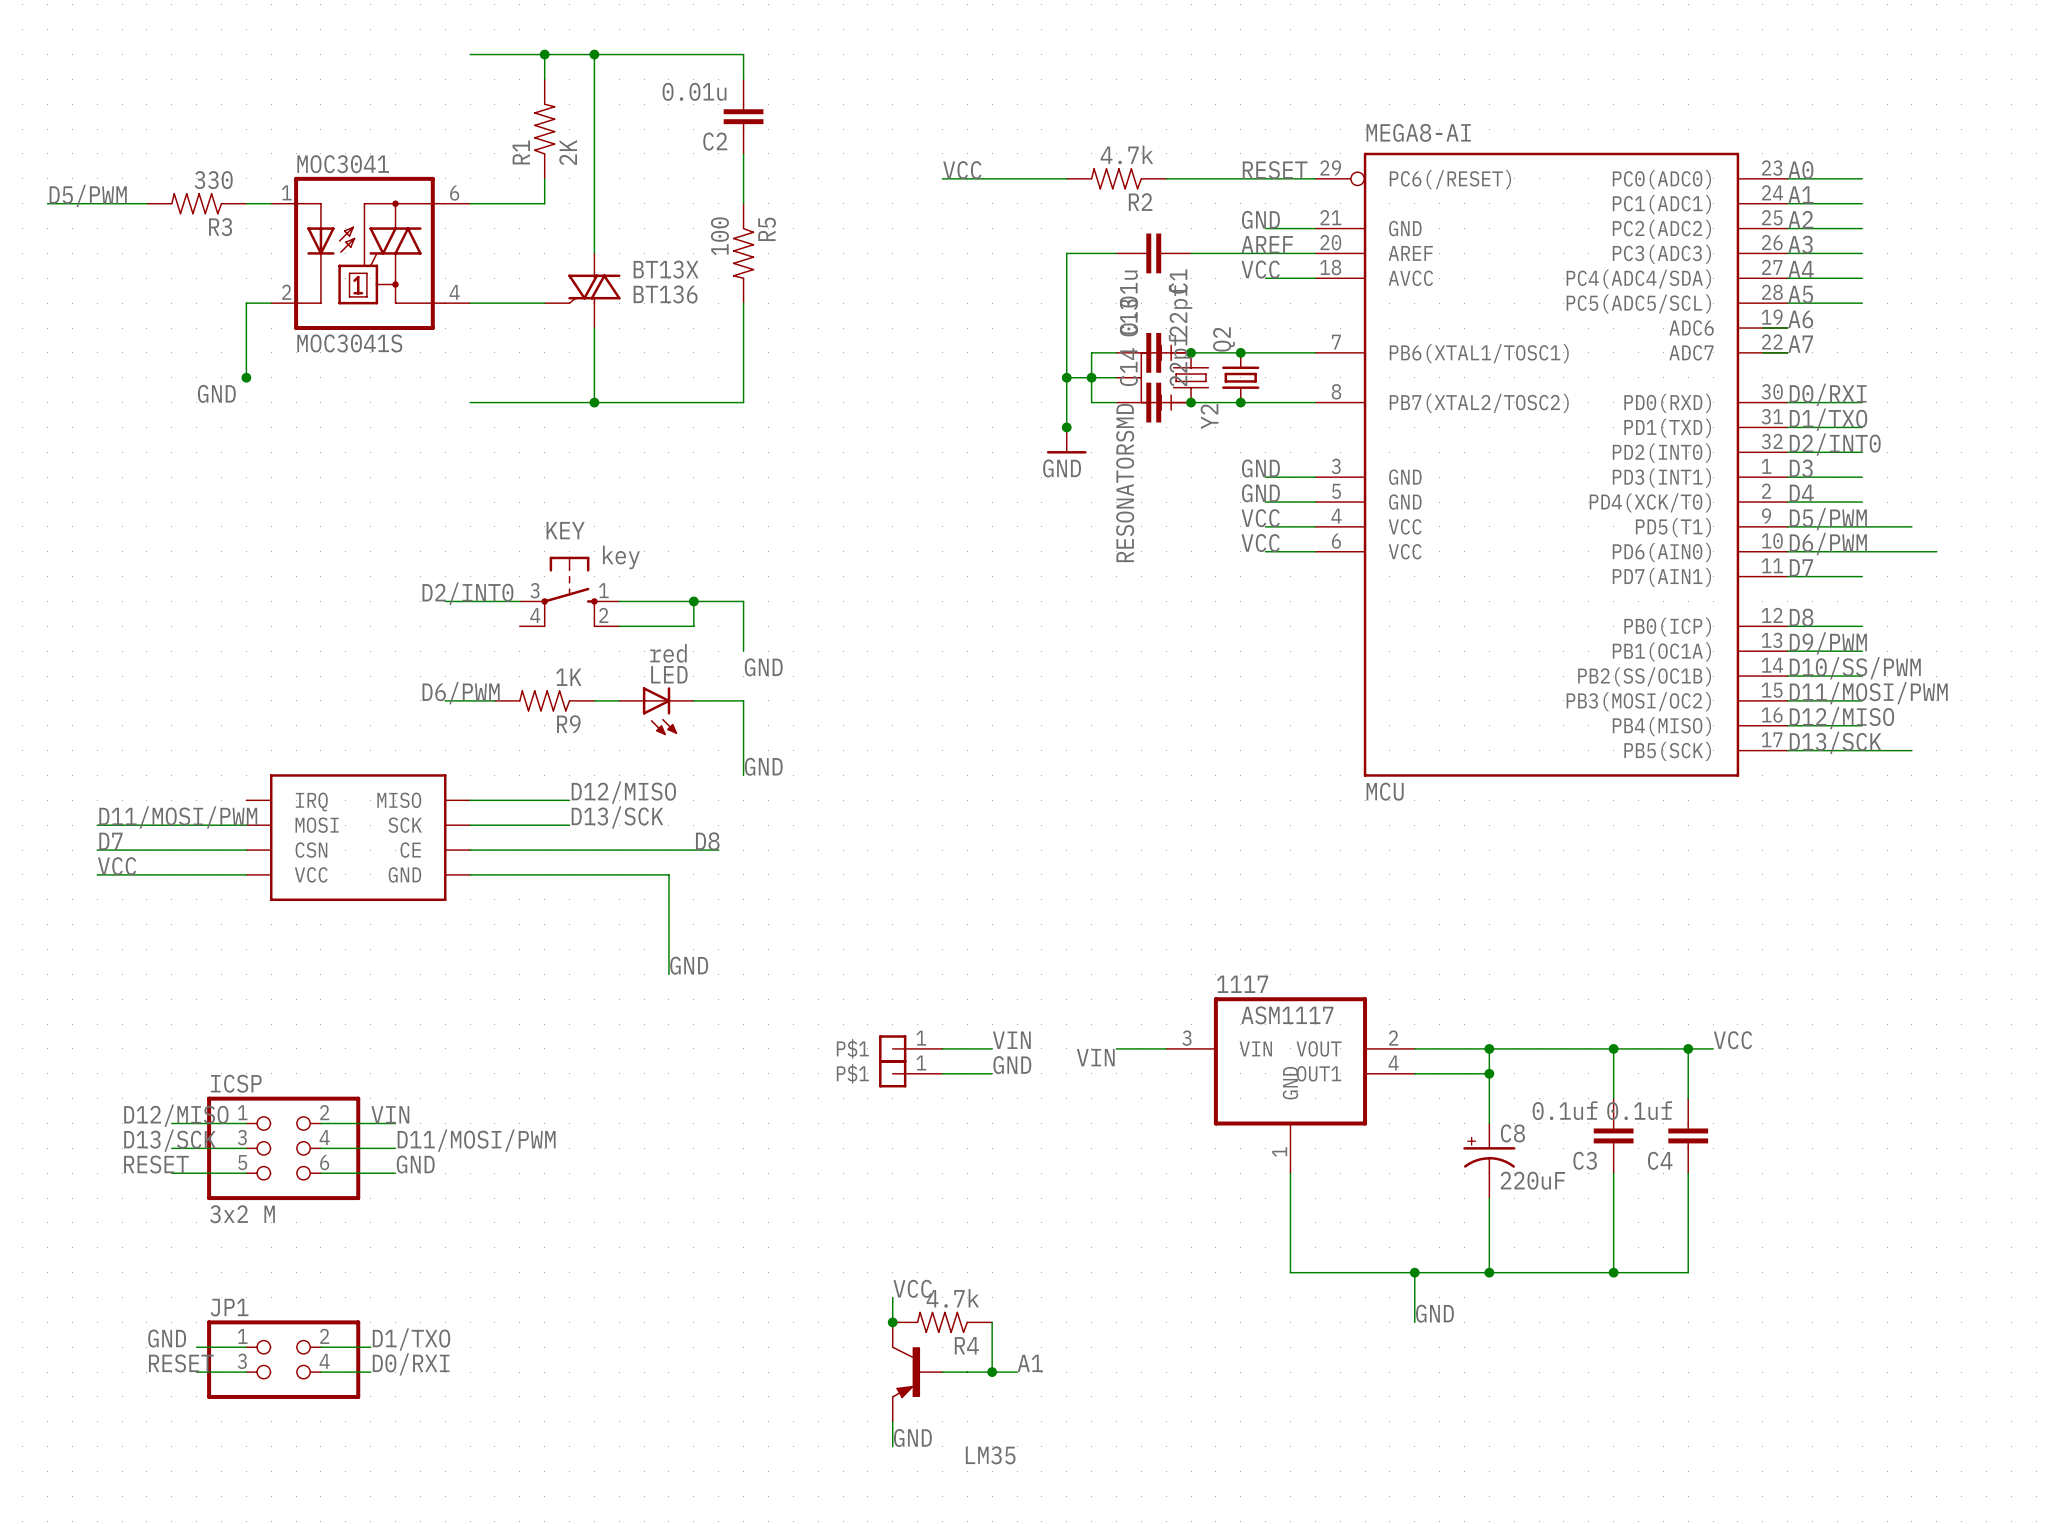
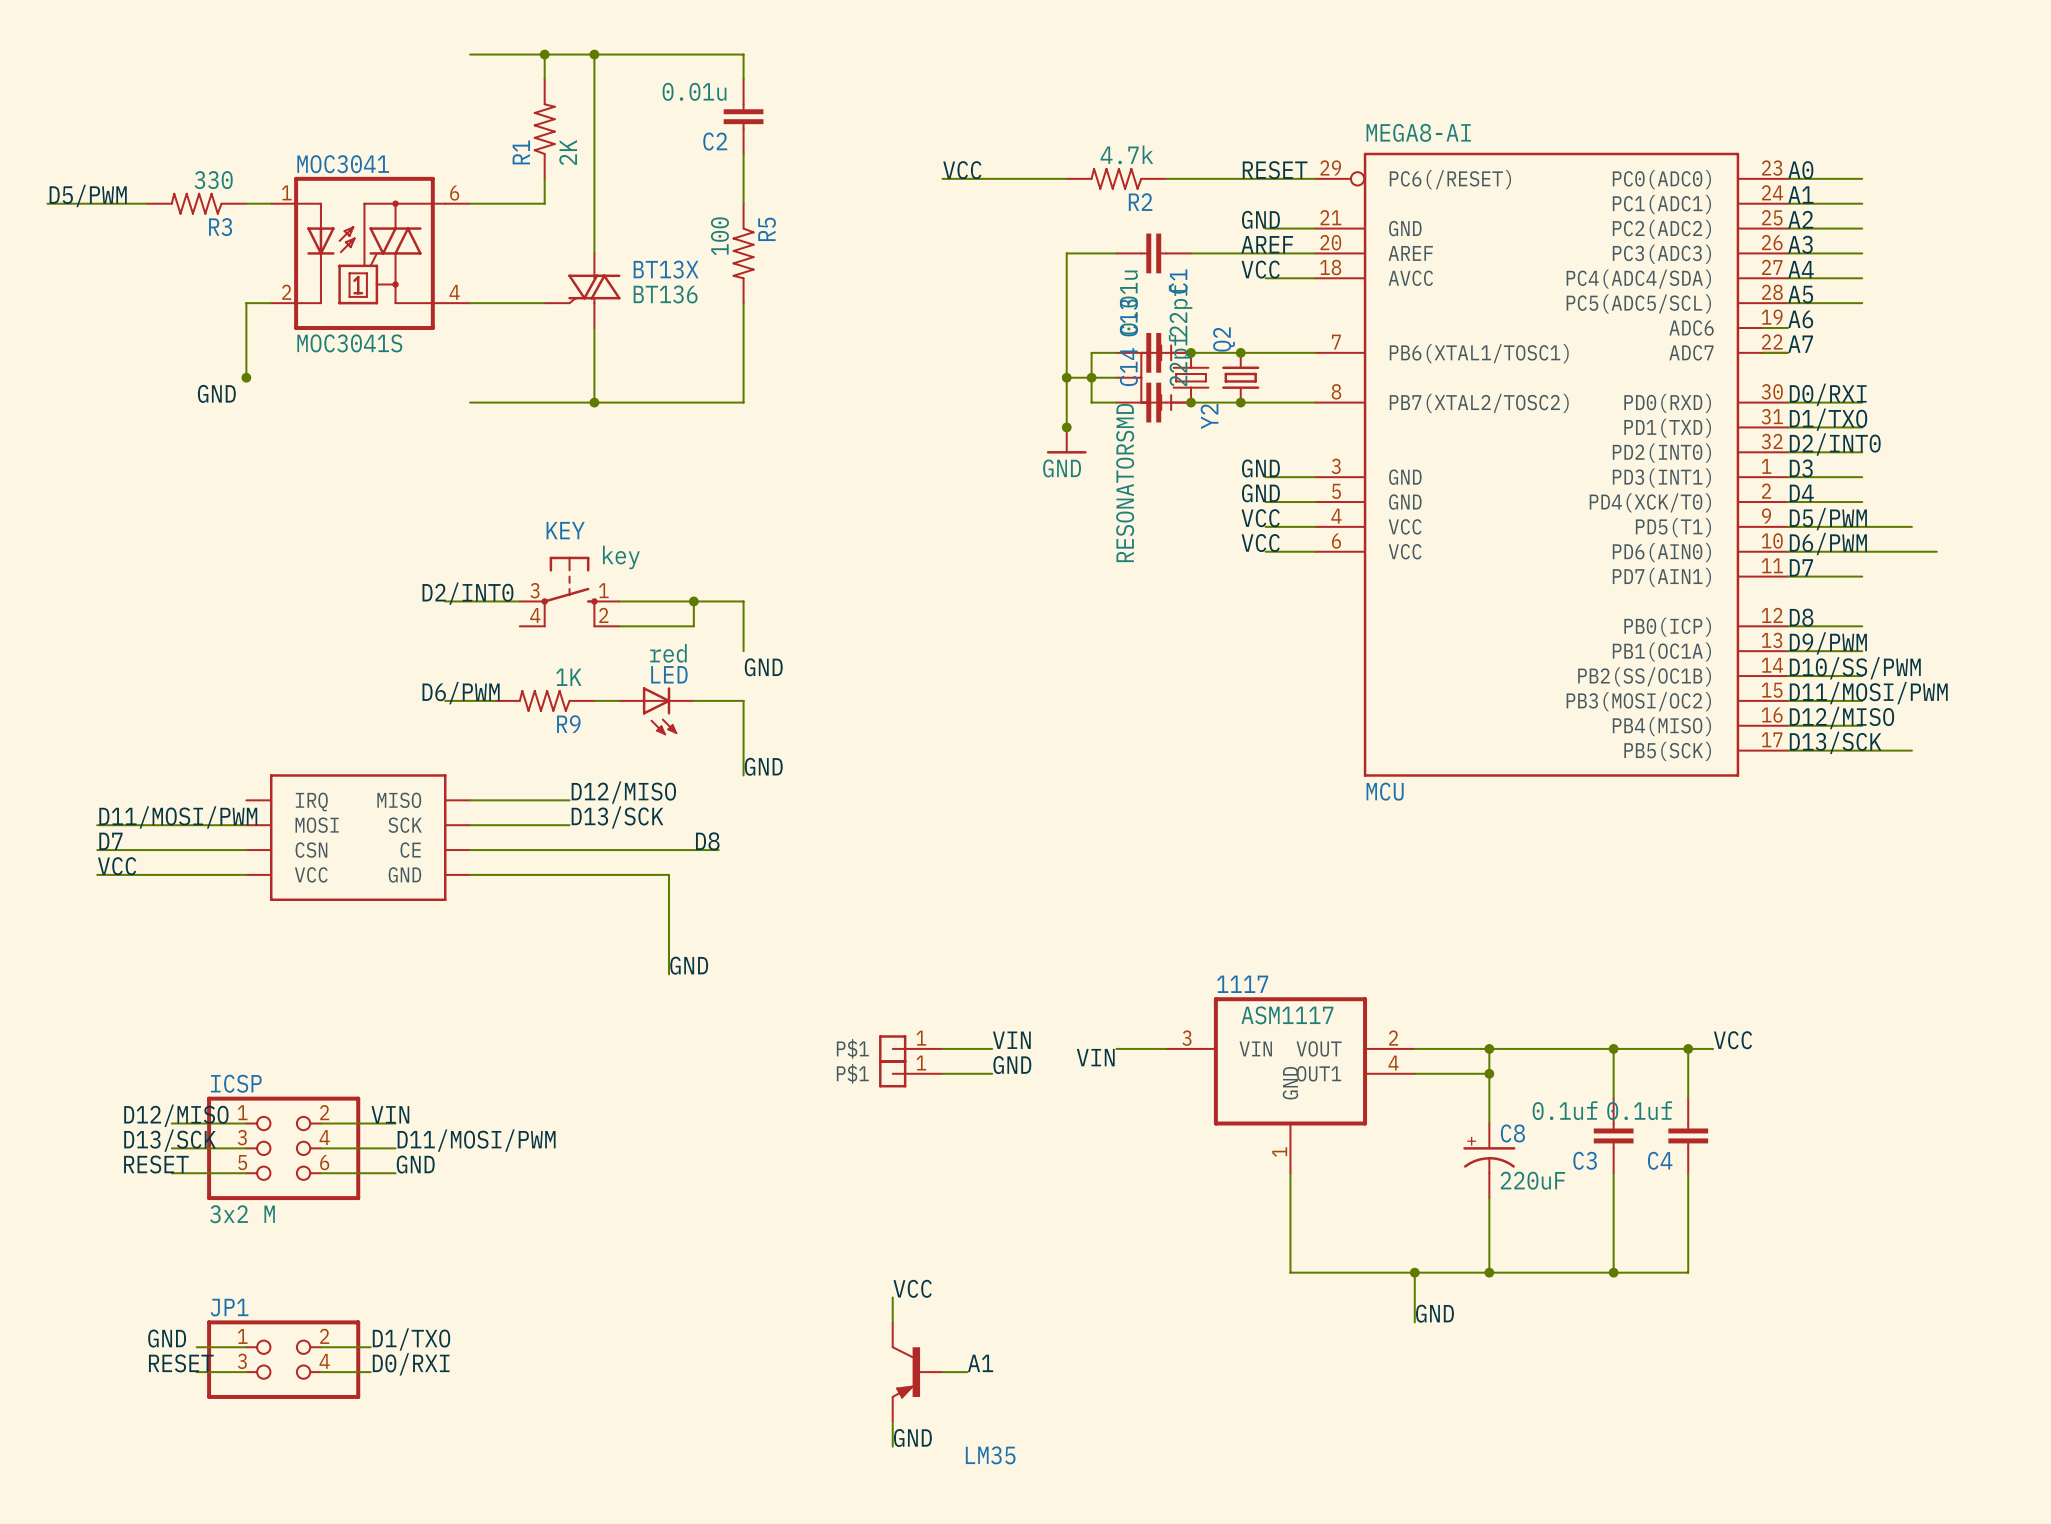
junction: (892, 1322) -> none
R4: 4.7k (942, 1322) -> none
wire: (992, 1322) (992, 1372) -> none
label position: A1 (1030, 1363) -> A1 (980, 1363)
wire: (967, 1372) (1017, 1372) -> none
junction: (992, 1372) -> none

